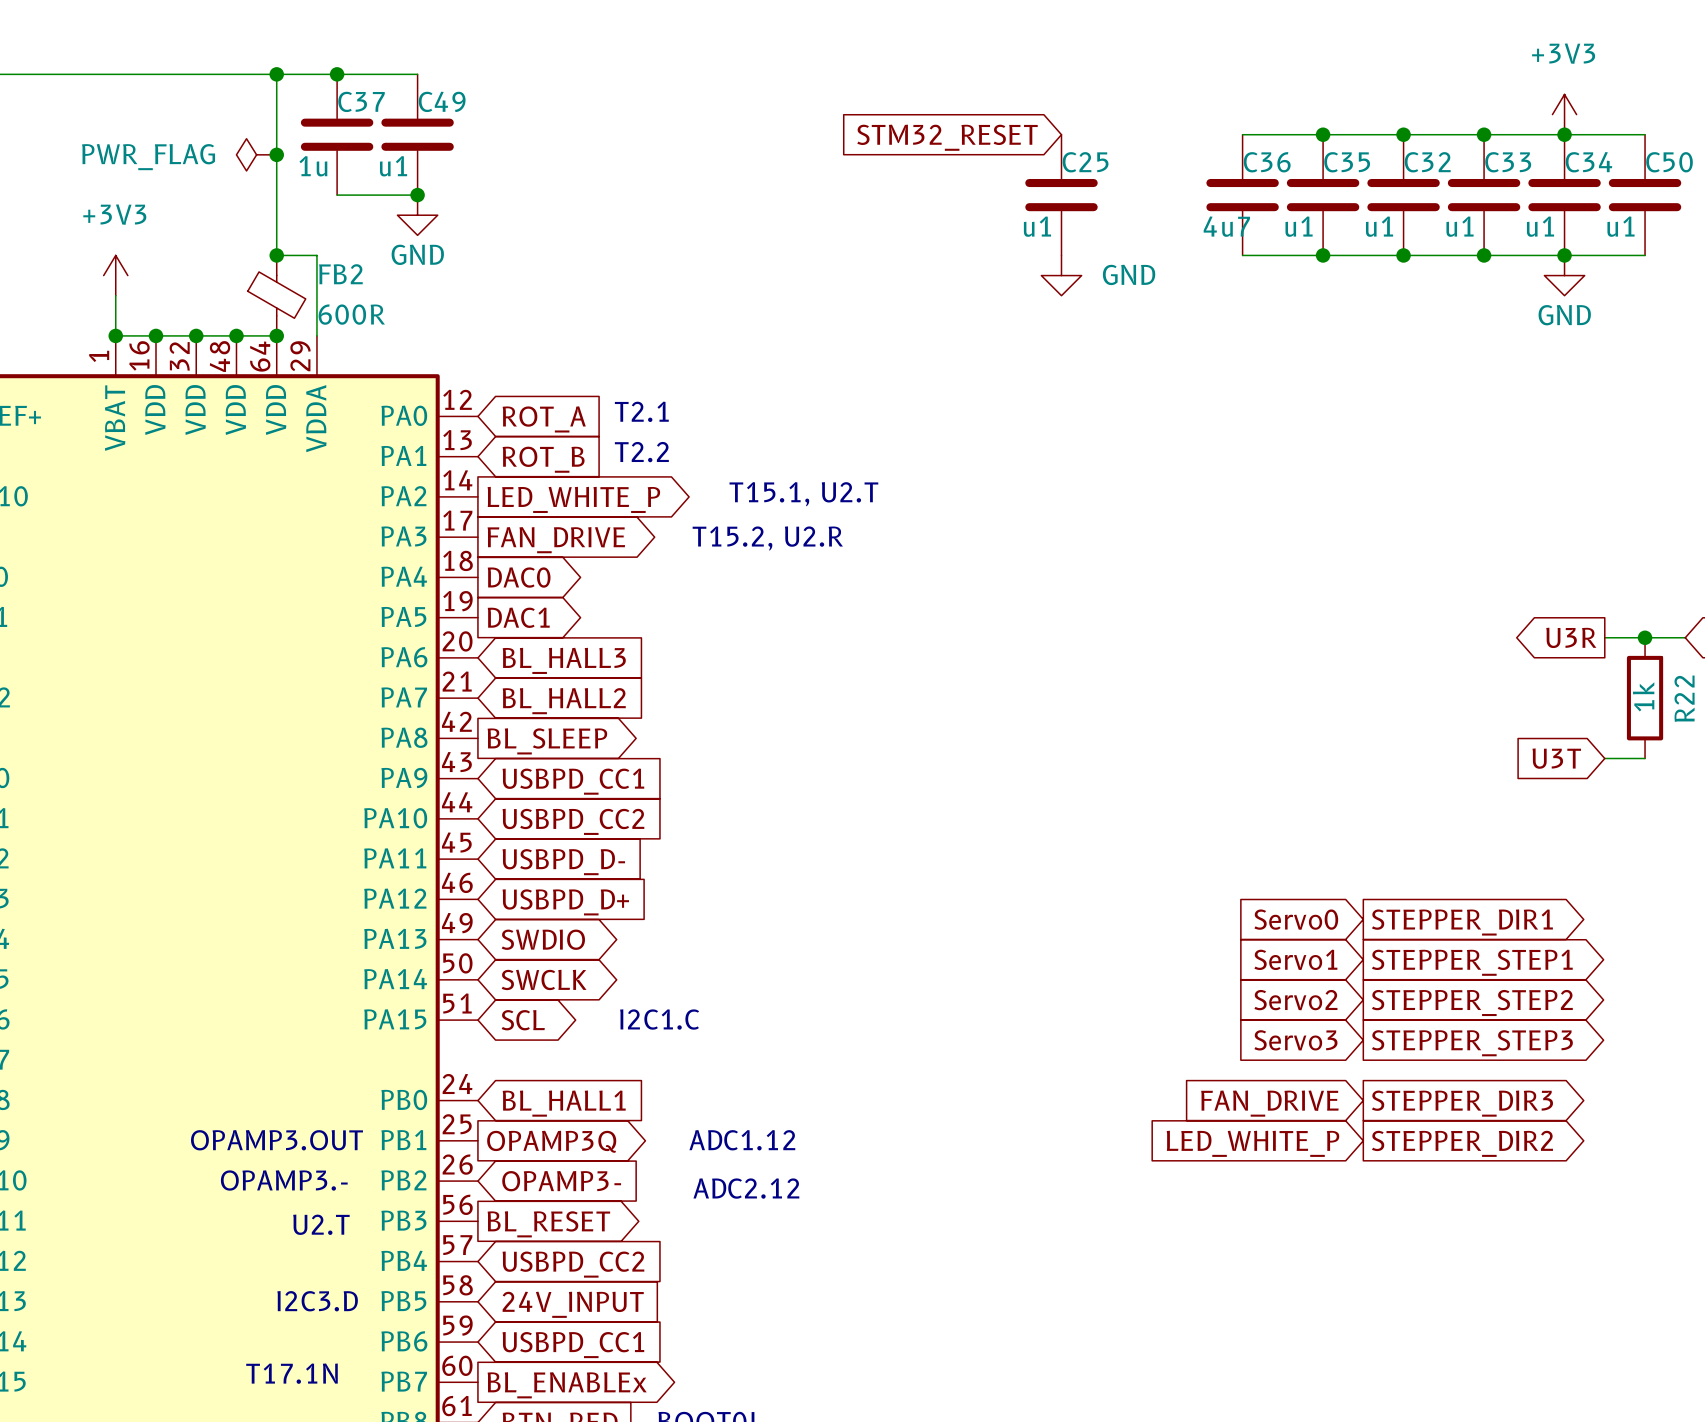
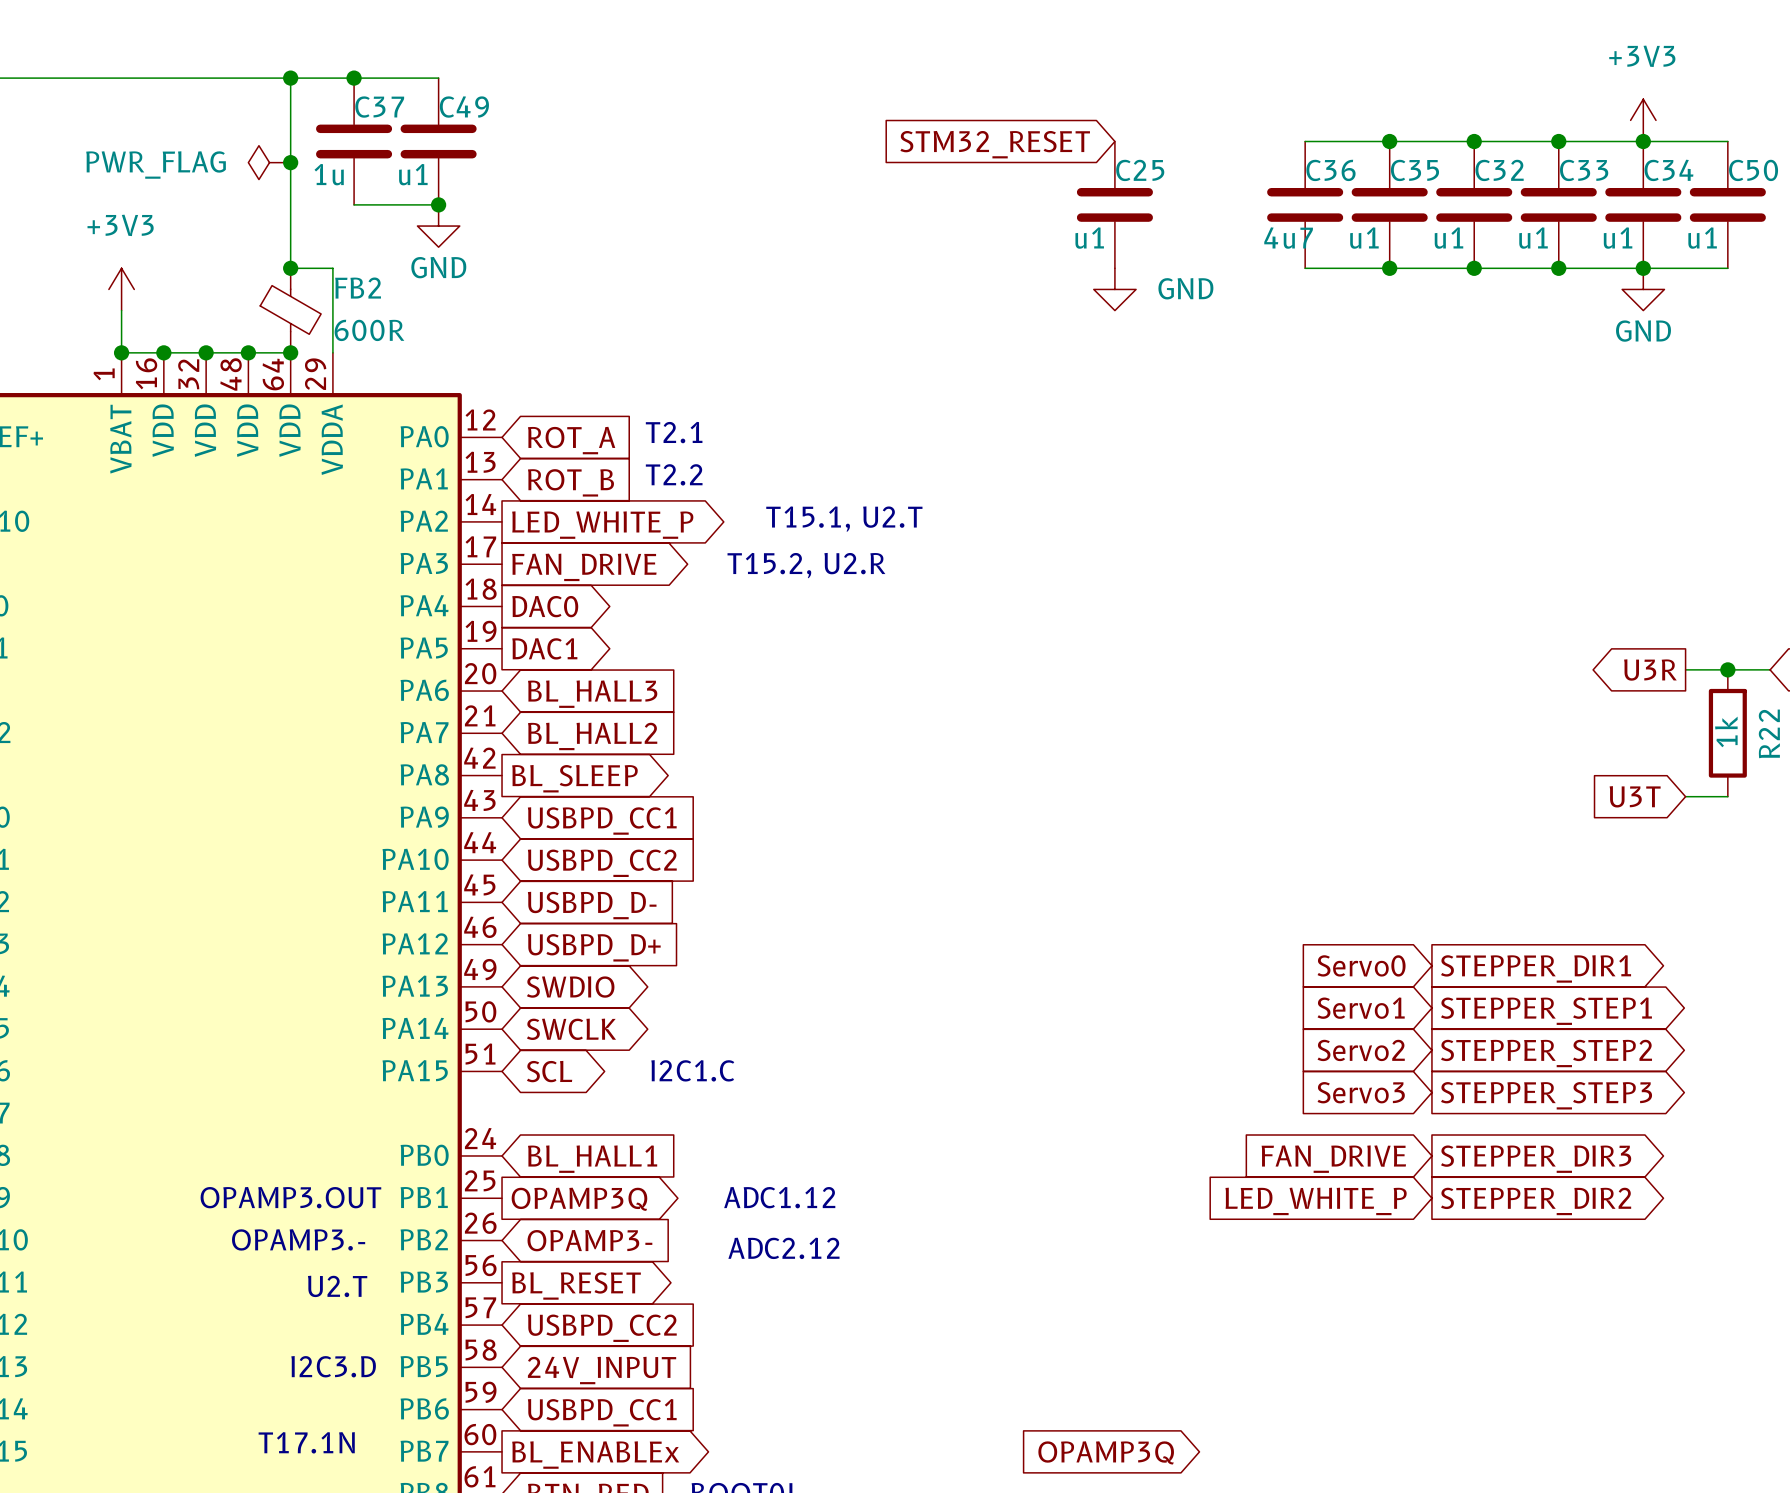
global label: none -> OPAMP3Q (1106, 1452)

